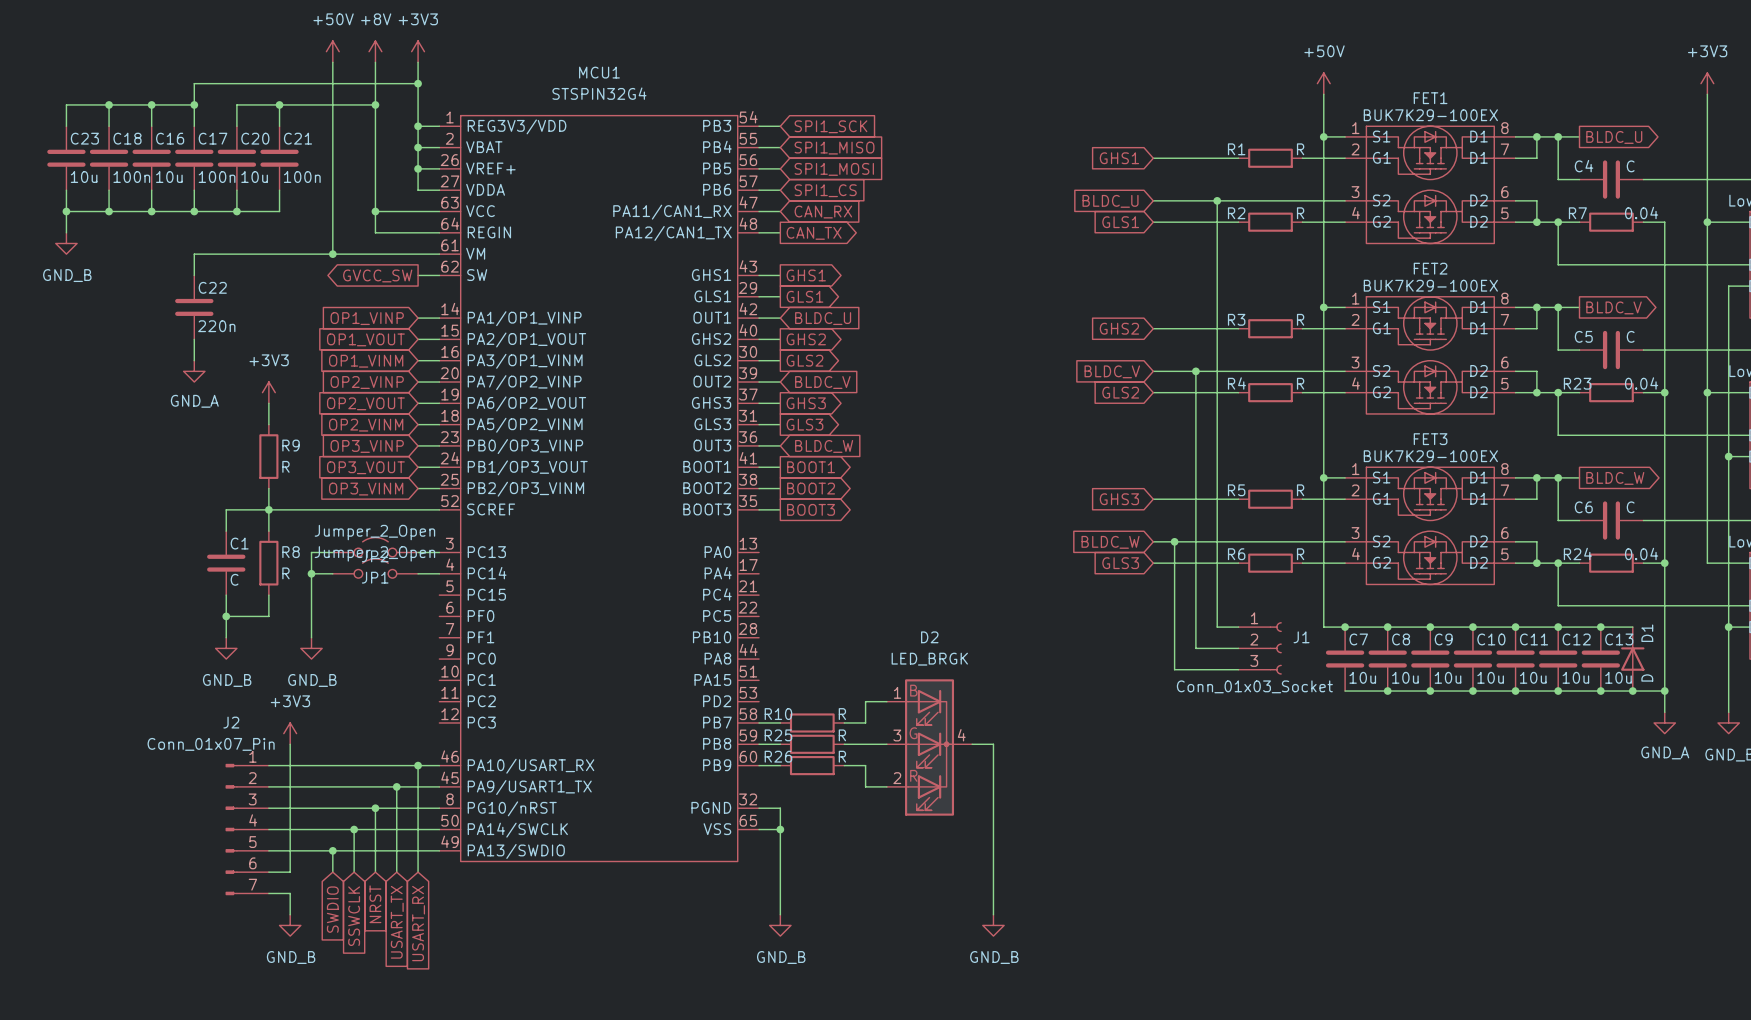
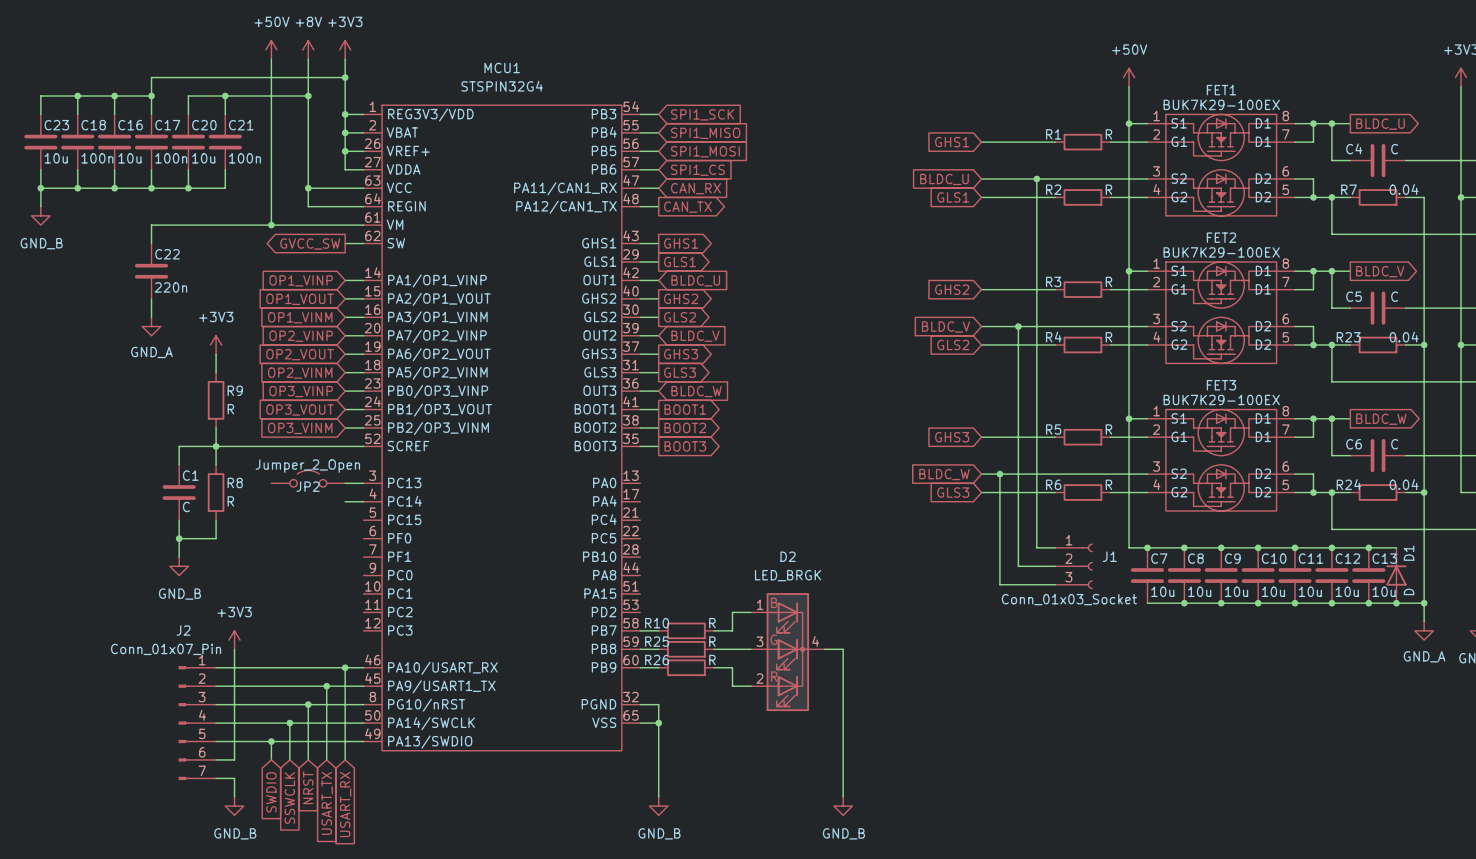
wire: (332, 552) (311, 552) (311, 637) -> none
JP1: Jumper_2_Open (375, 568) -> none
wire: (311, 573) (332, 573) -> none
junction: (311, 573) -> none
power symbol: GND_B (311, 648) -> none

